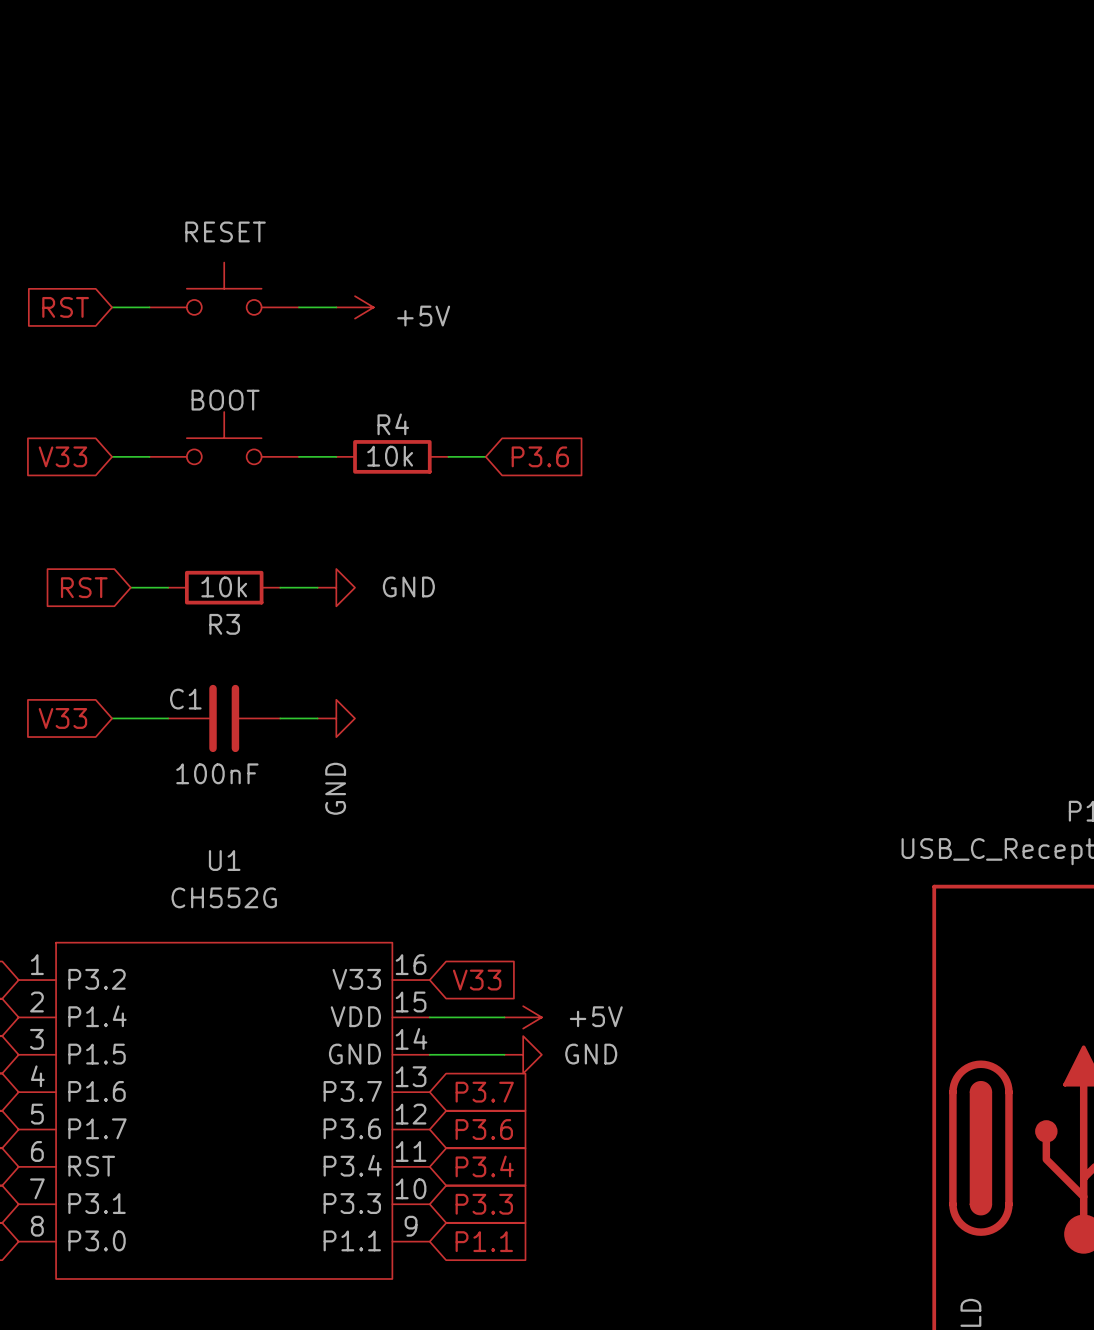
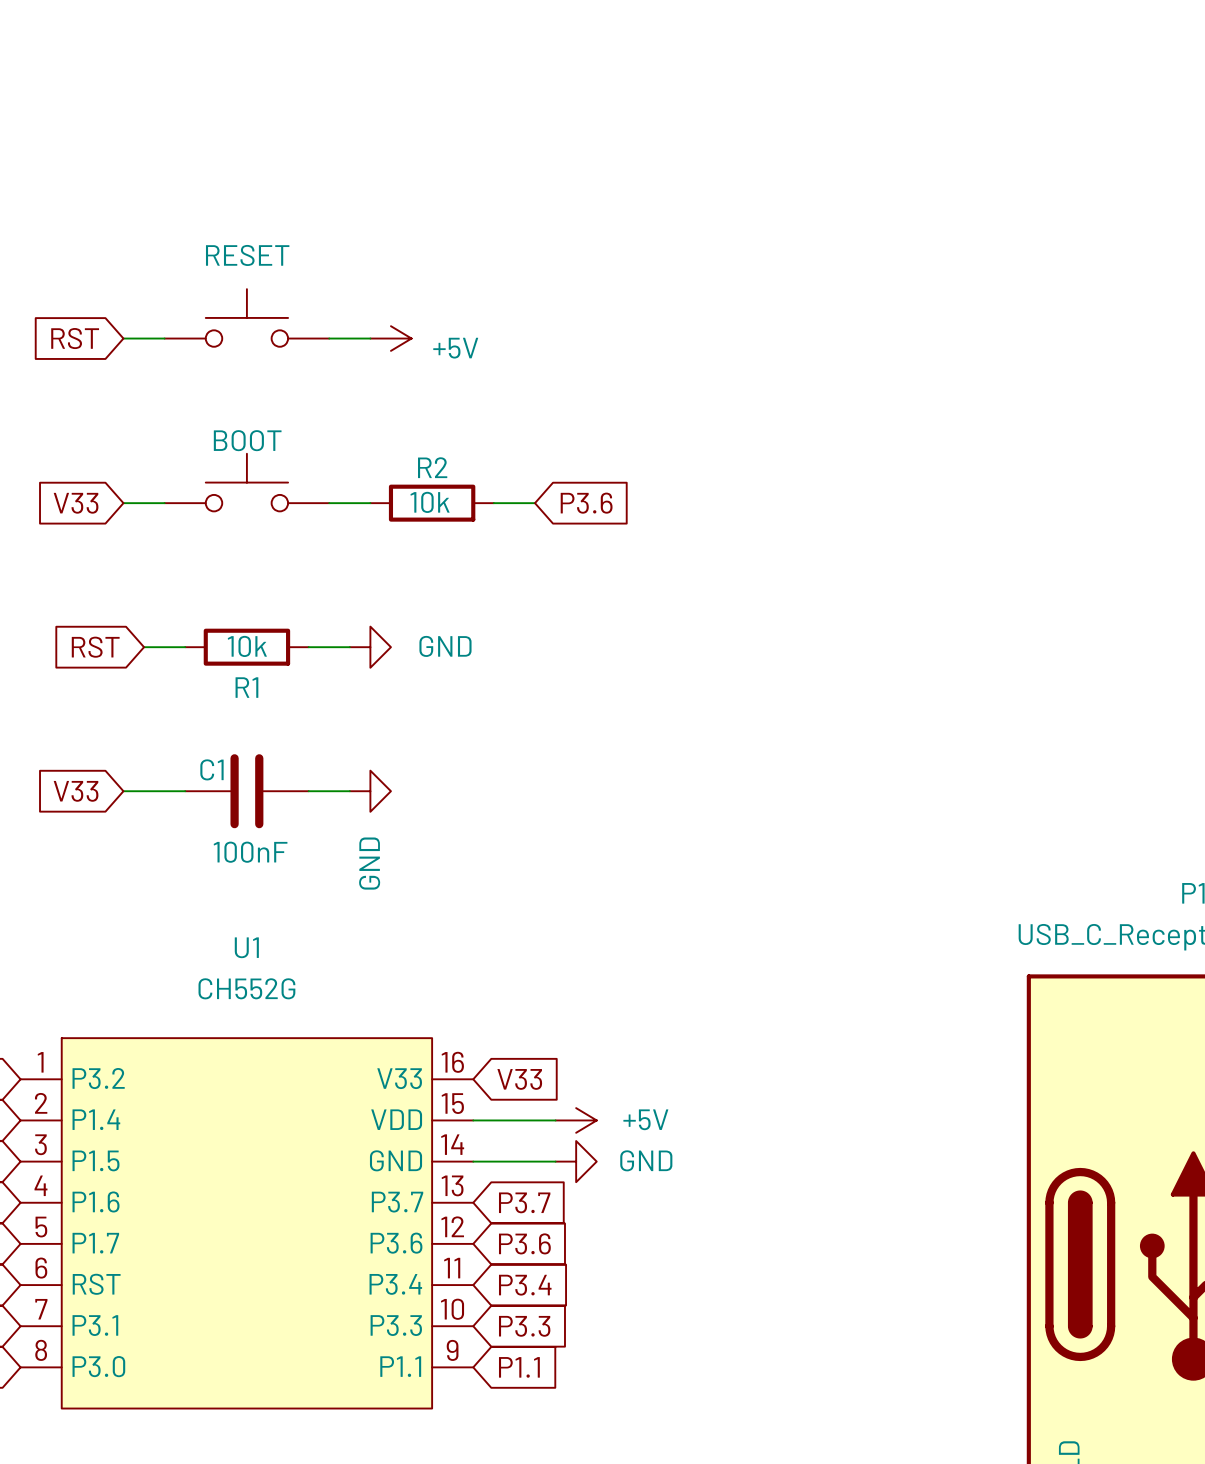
R4 name: R4 (393, 424) -> R2 (432, 467)
R3 name: R3 (224, 624) -> R1 (246, 687)

